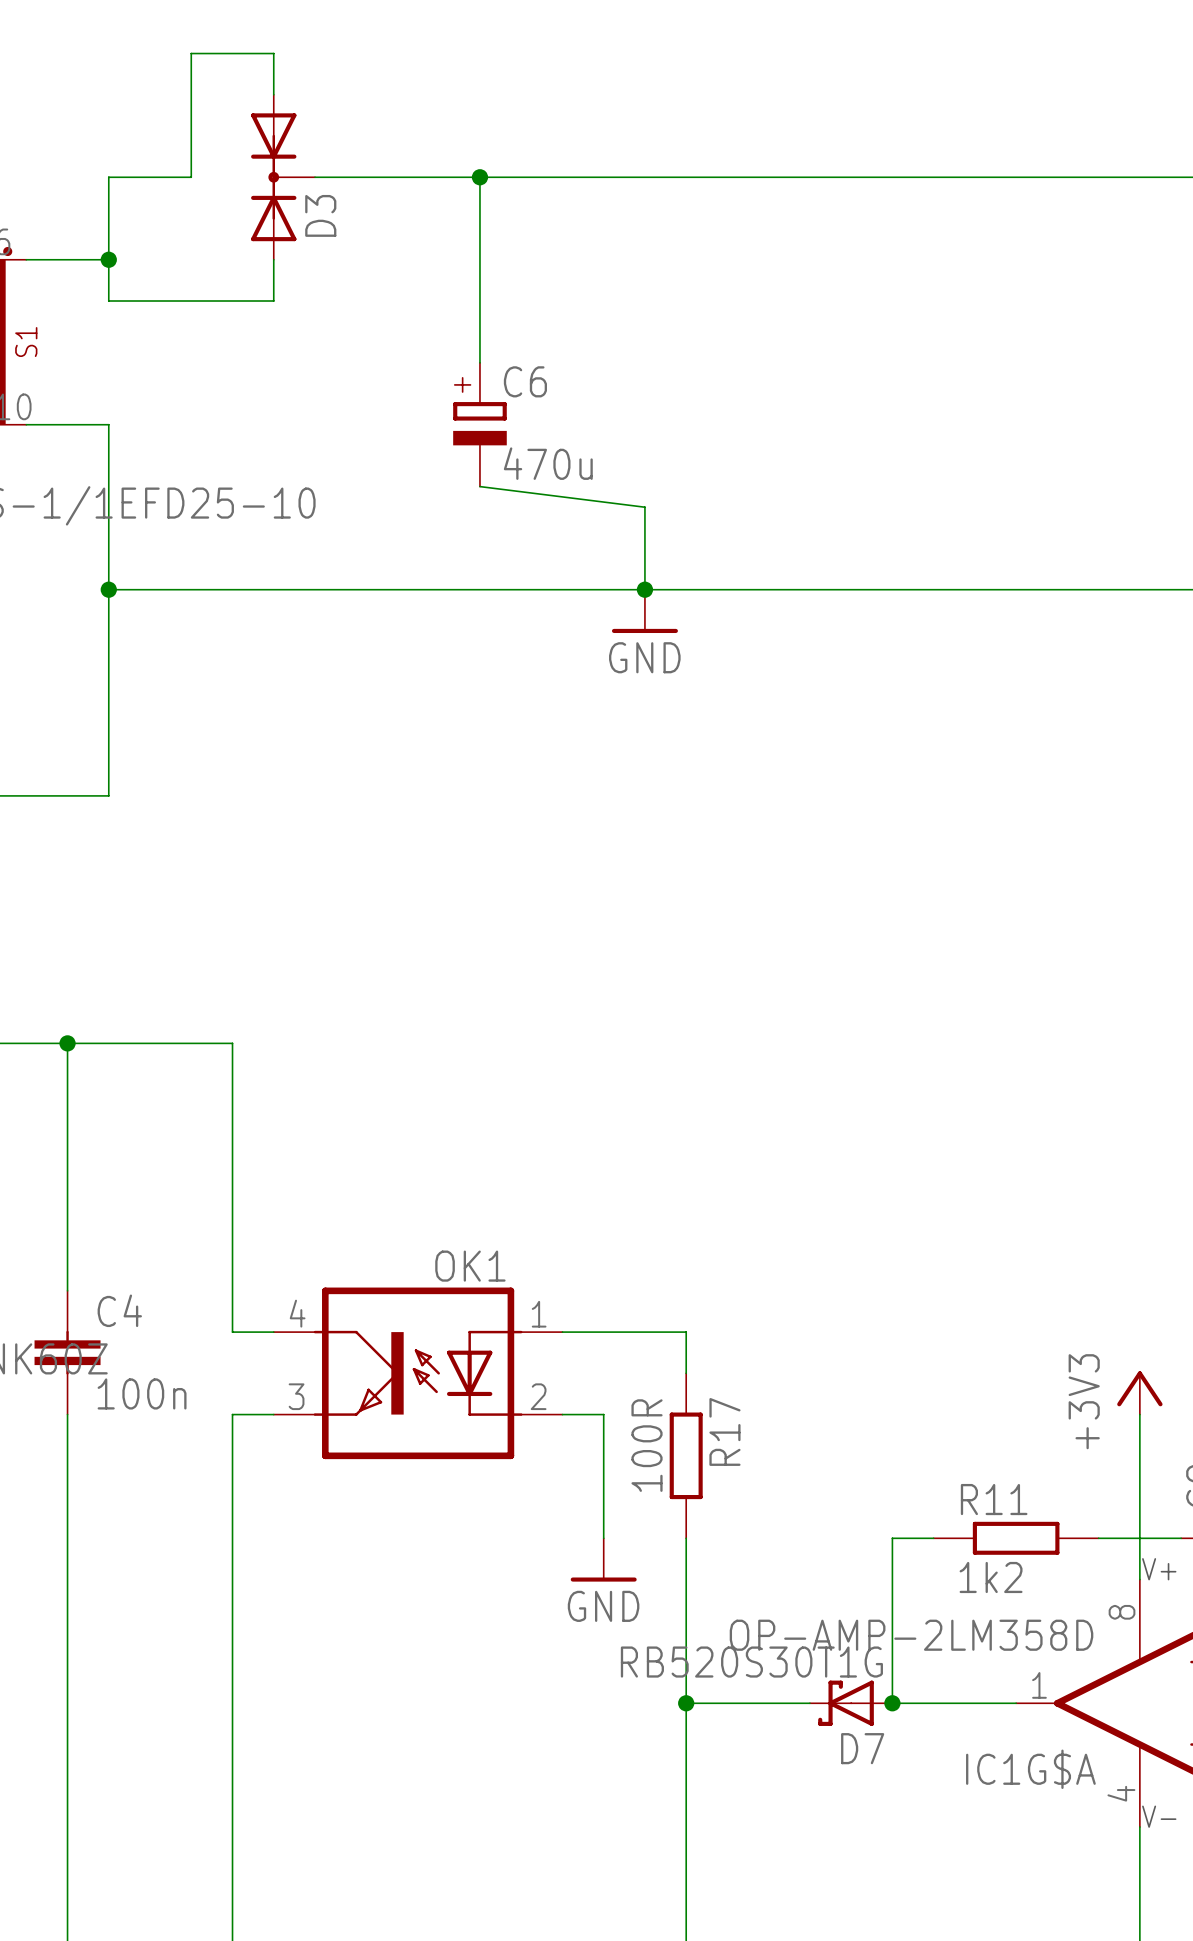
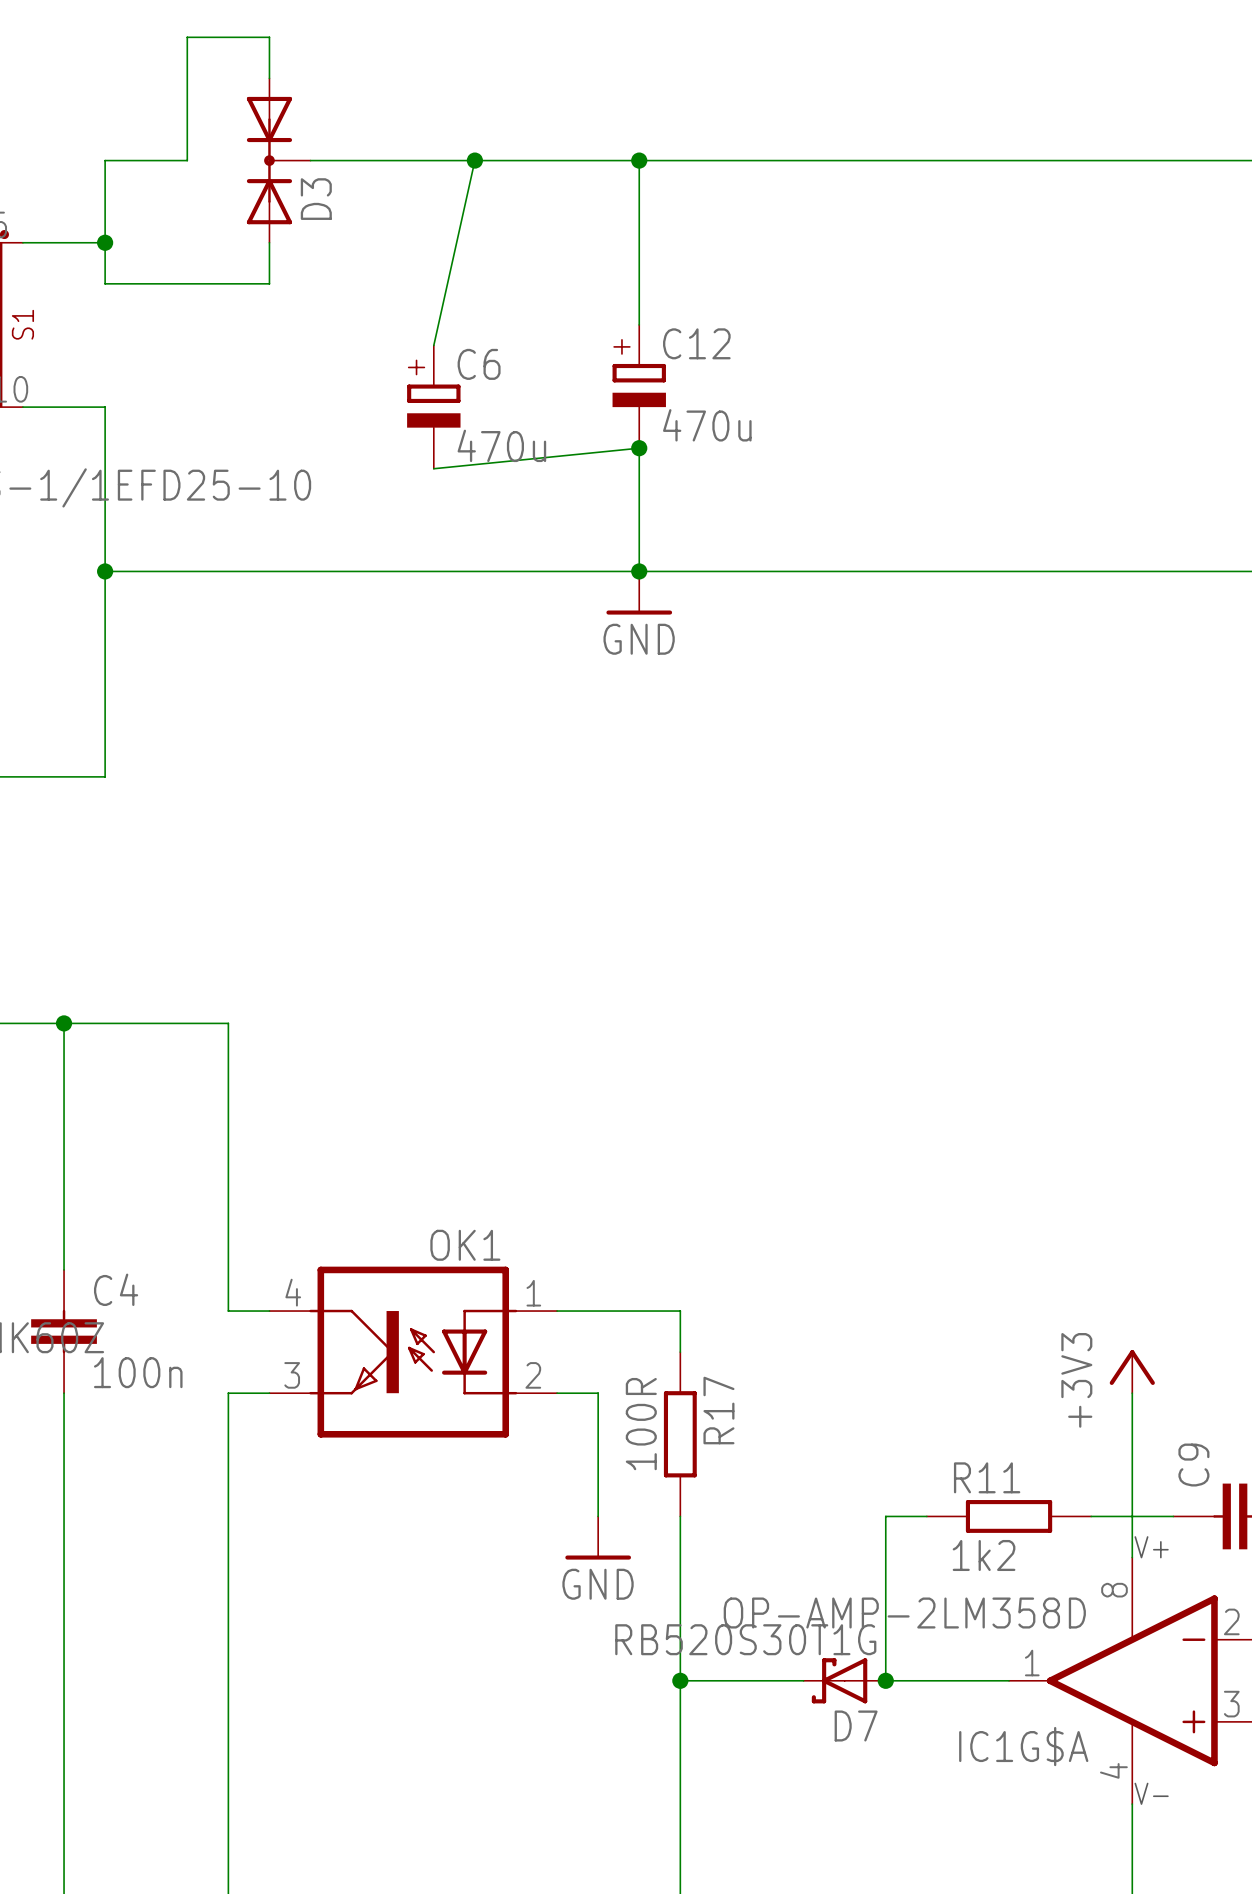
wire: (479, 177) (479, 362) -> (474, 160) (433, 345)
wire: none -> (639, 160) (639, 324)
junction: none -> (639, 160)
C12: none -> 470u (639, 386)
C6 position: (479, 424) -> (433, 407)
junction: none -> (639, 448)
wire: (479, 486) (644, 507) -> (433, 468) (639, 448) (639, 489)

